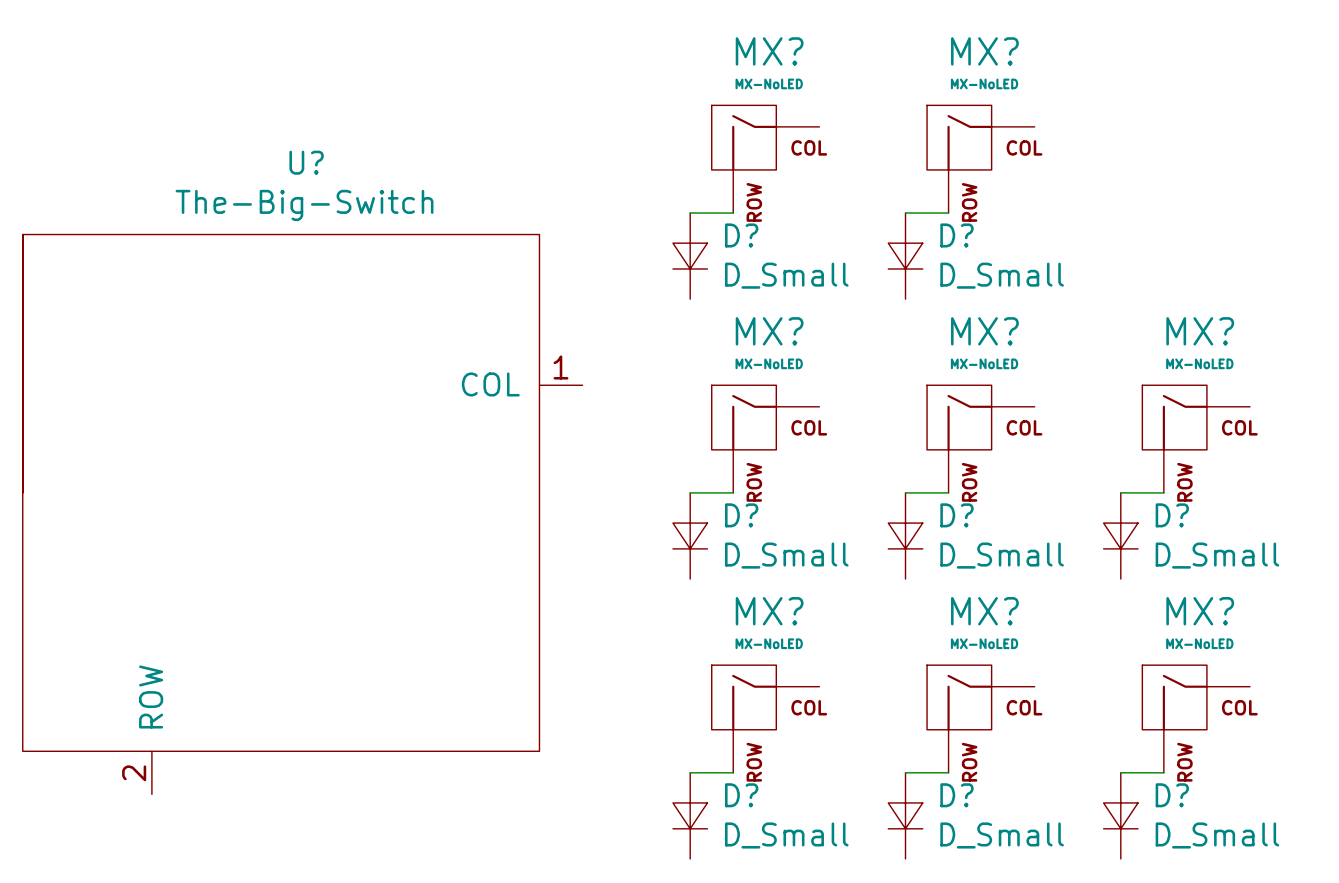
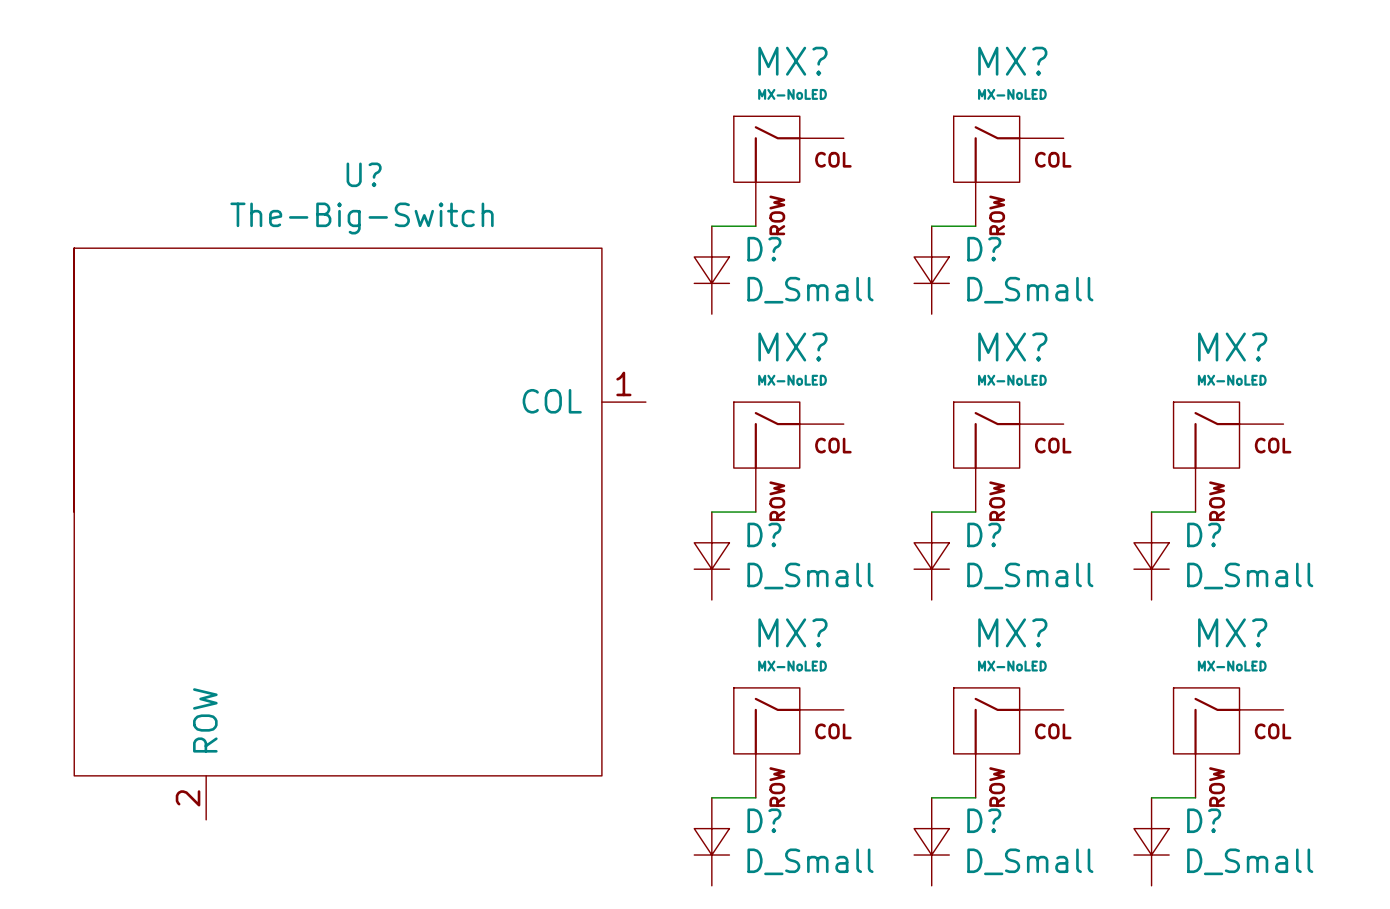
U? position: (302, 514) -> (360, 534)

